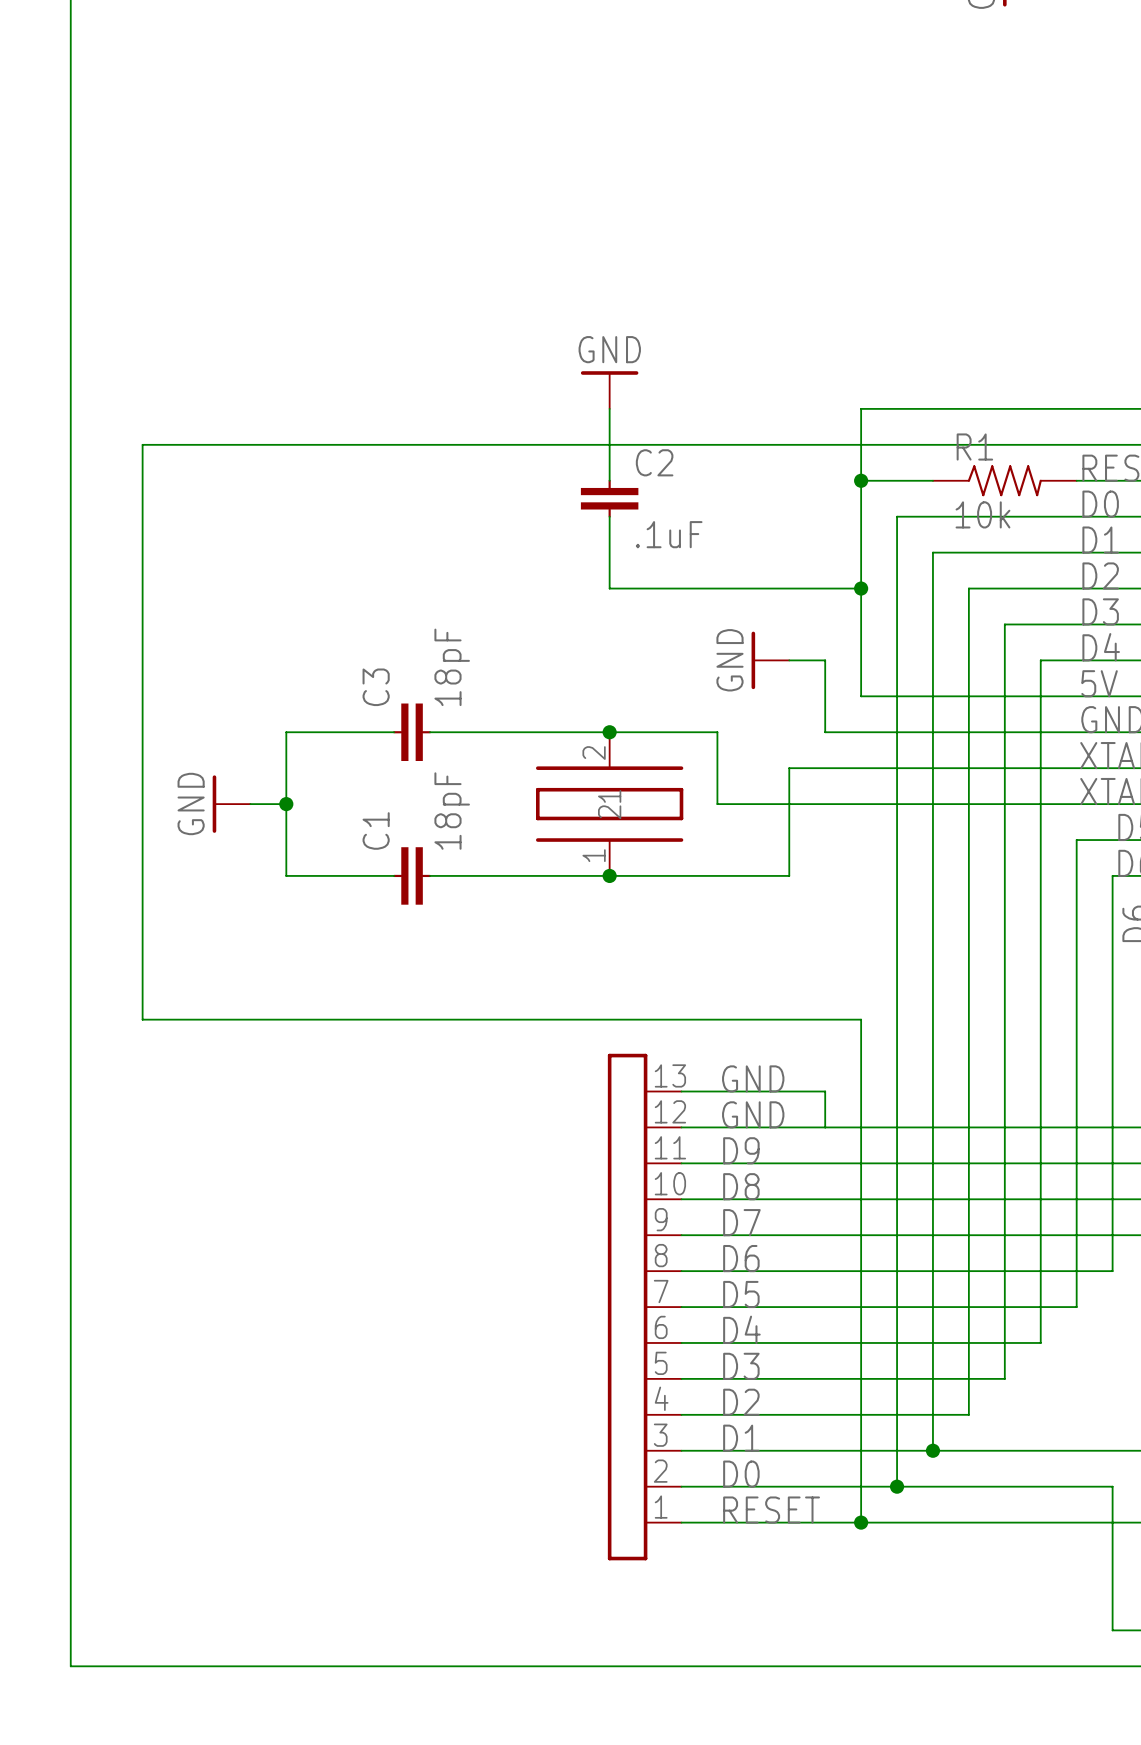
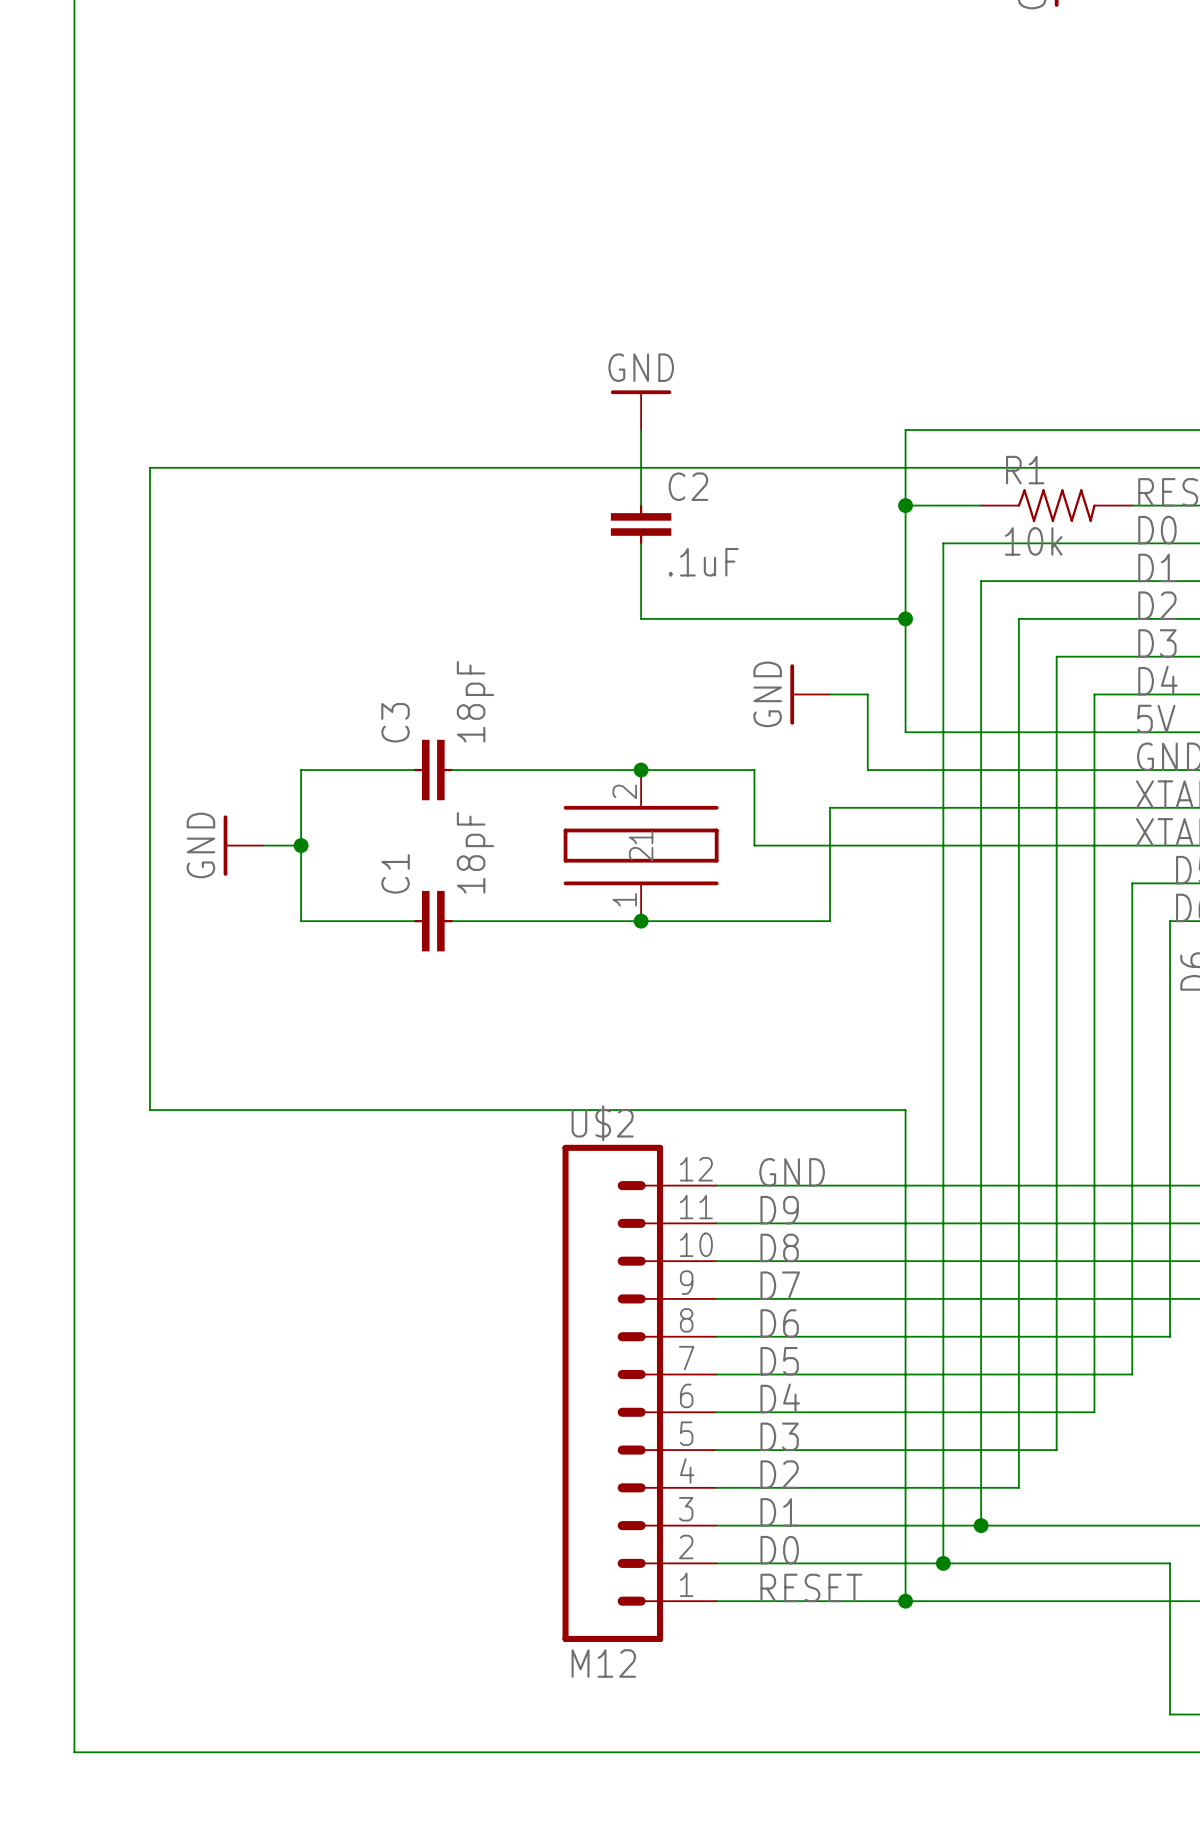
wire: (142, 1019) (861, 1019) (861, 1055) -> (149, 1072) (149, 1110) (905, 1110)
label: GND (753, 1078) -> none
wire: (681, 1091) (825, 1091) (825, 1127) -> none
part: (644, 1307) -> none
U$2: none -> M12 (639, 1393)

